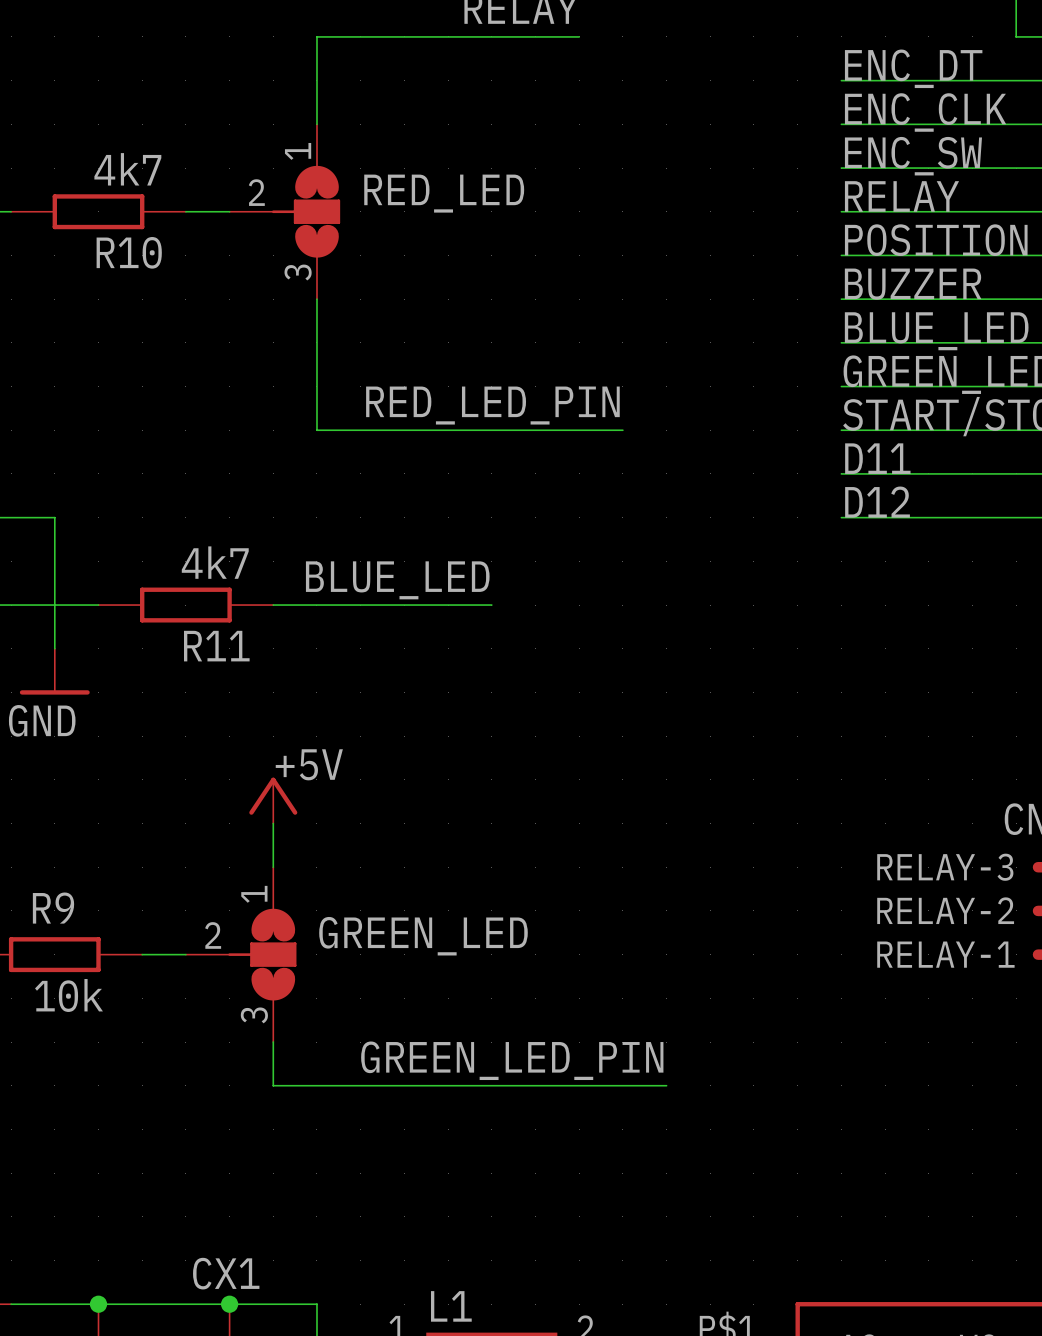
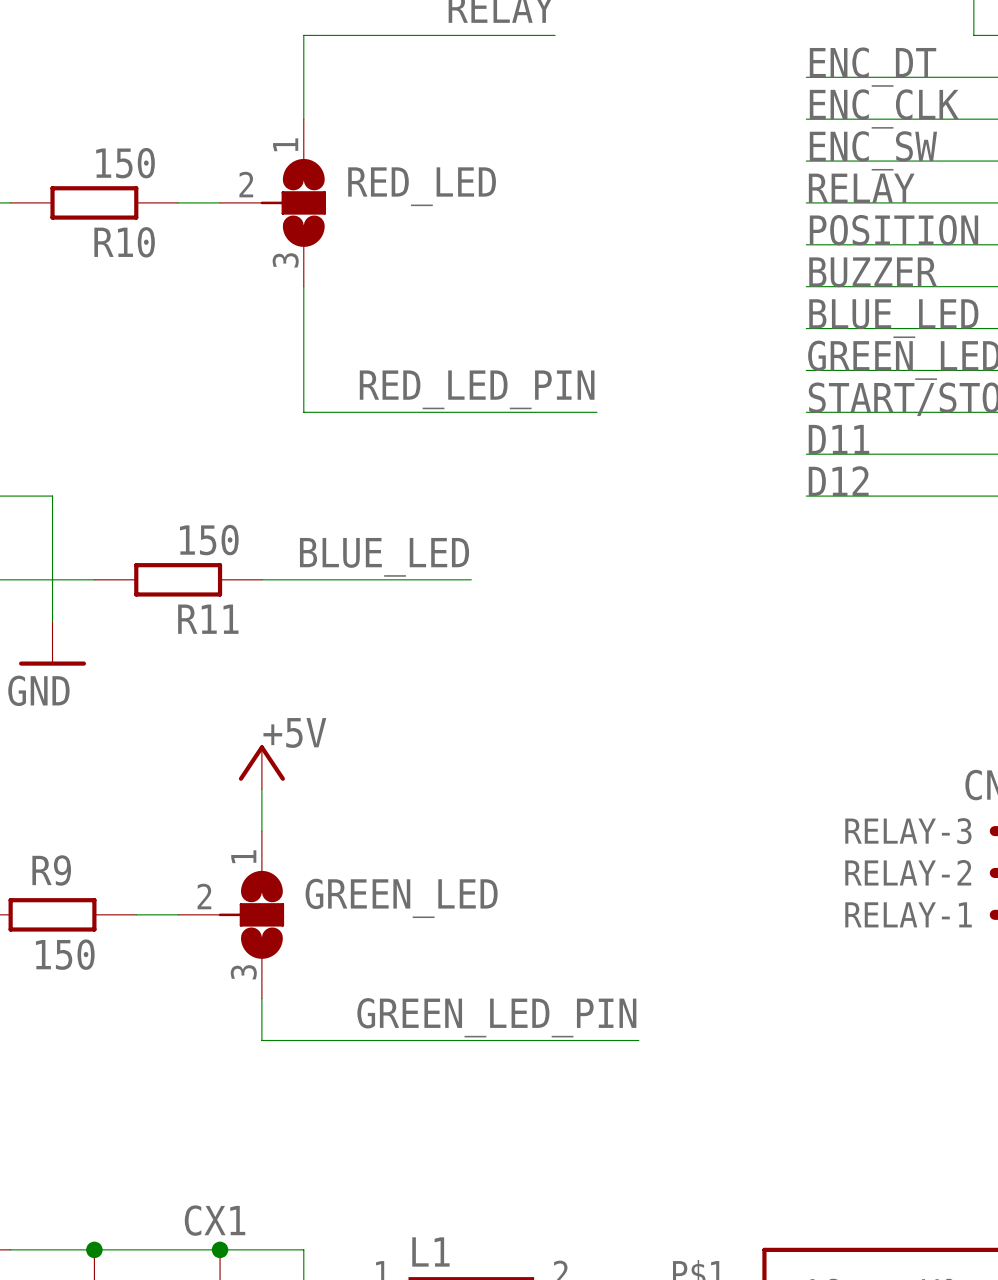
R10 value: 4k7 (127, 169) -> 150 (125, 163)
R11 value: 4k7 (215, 562) -> 150 (209, 540)
R9 value: 10k (68, 995) -> 150 (65, 954)

